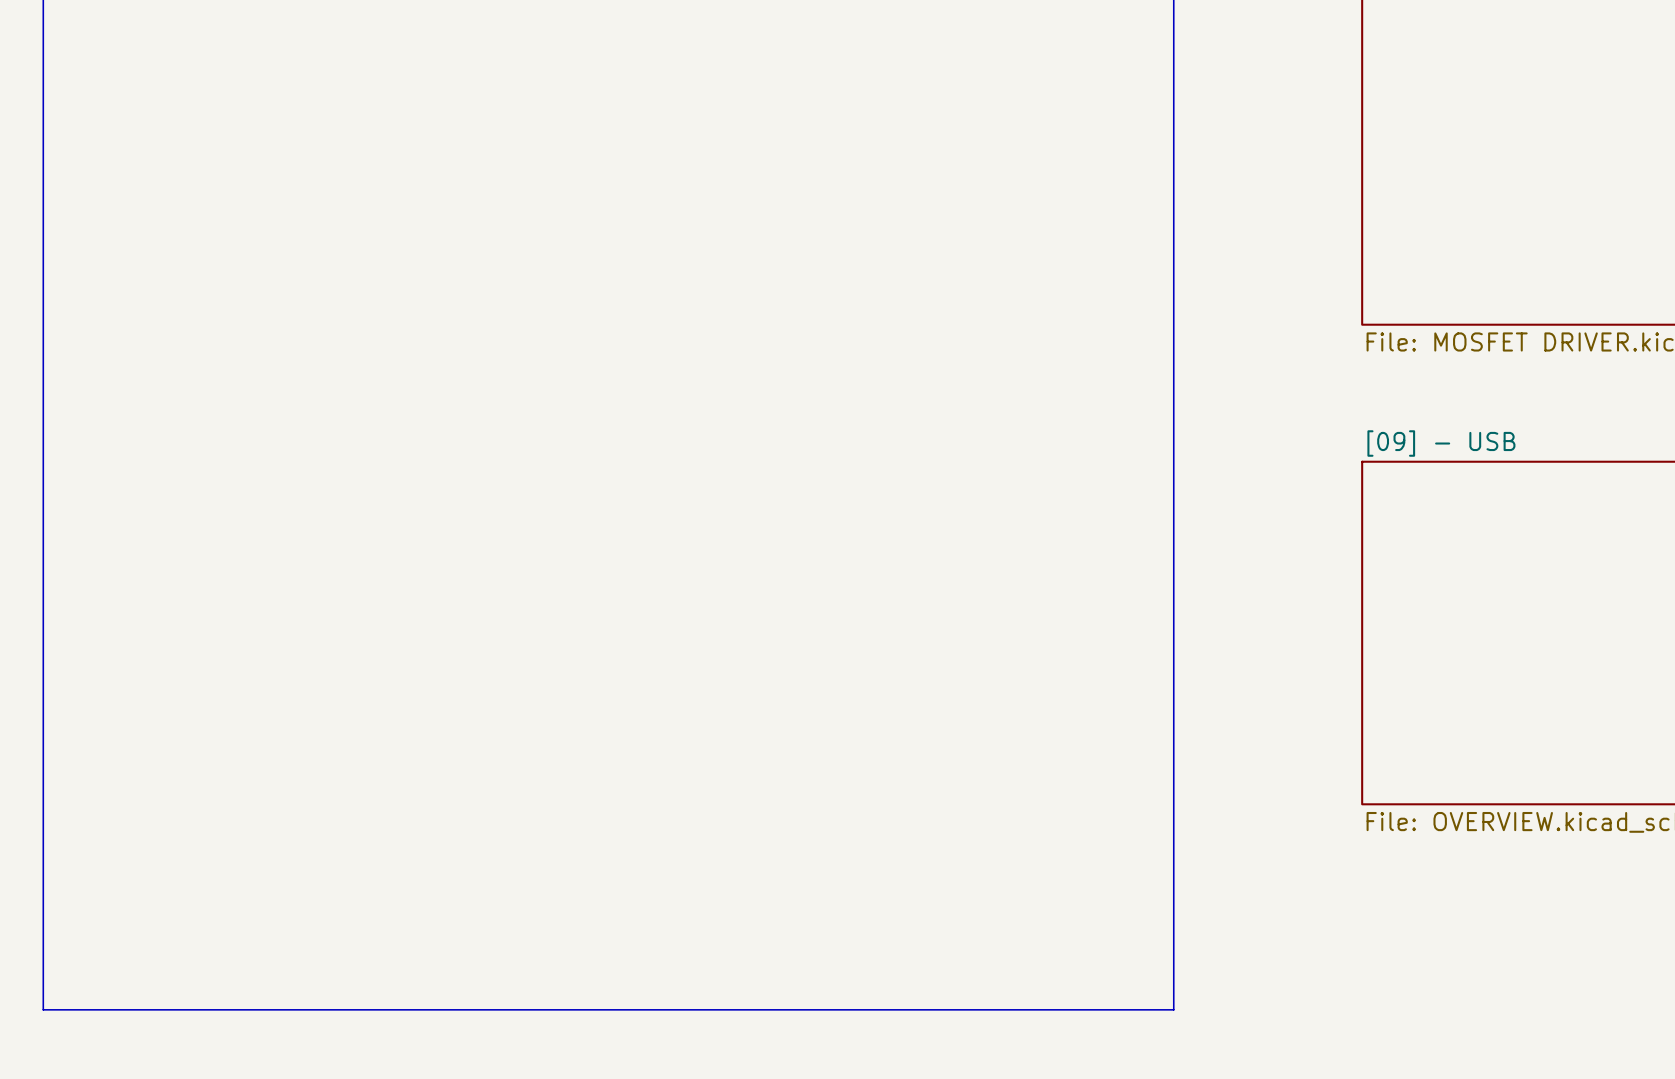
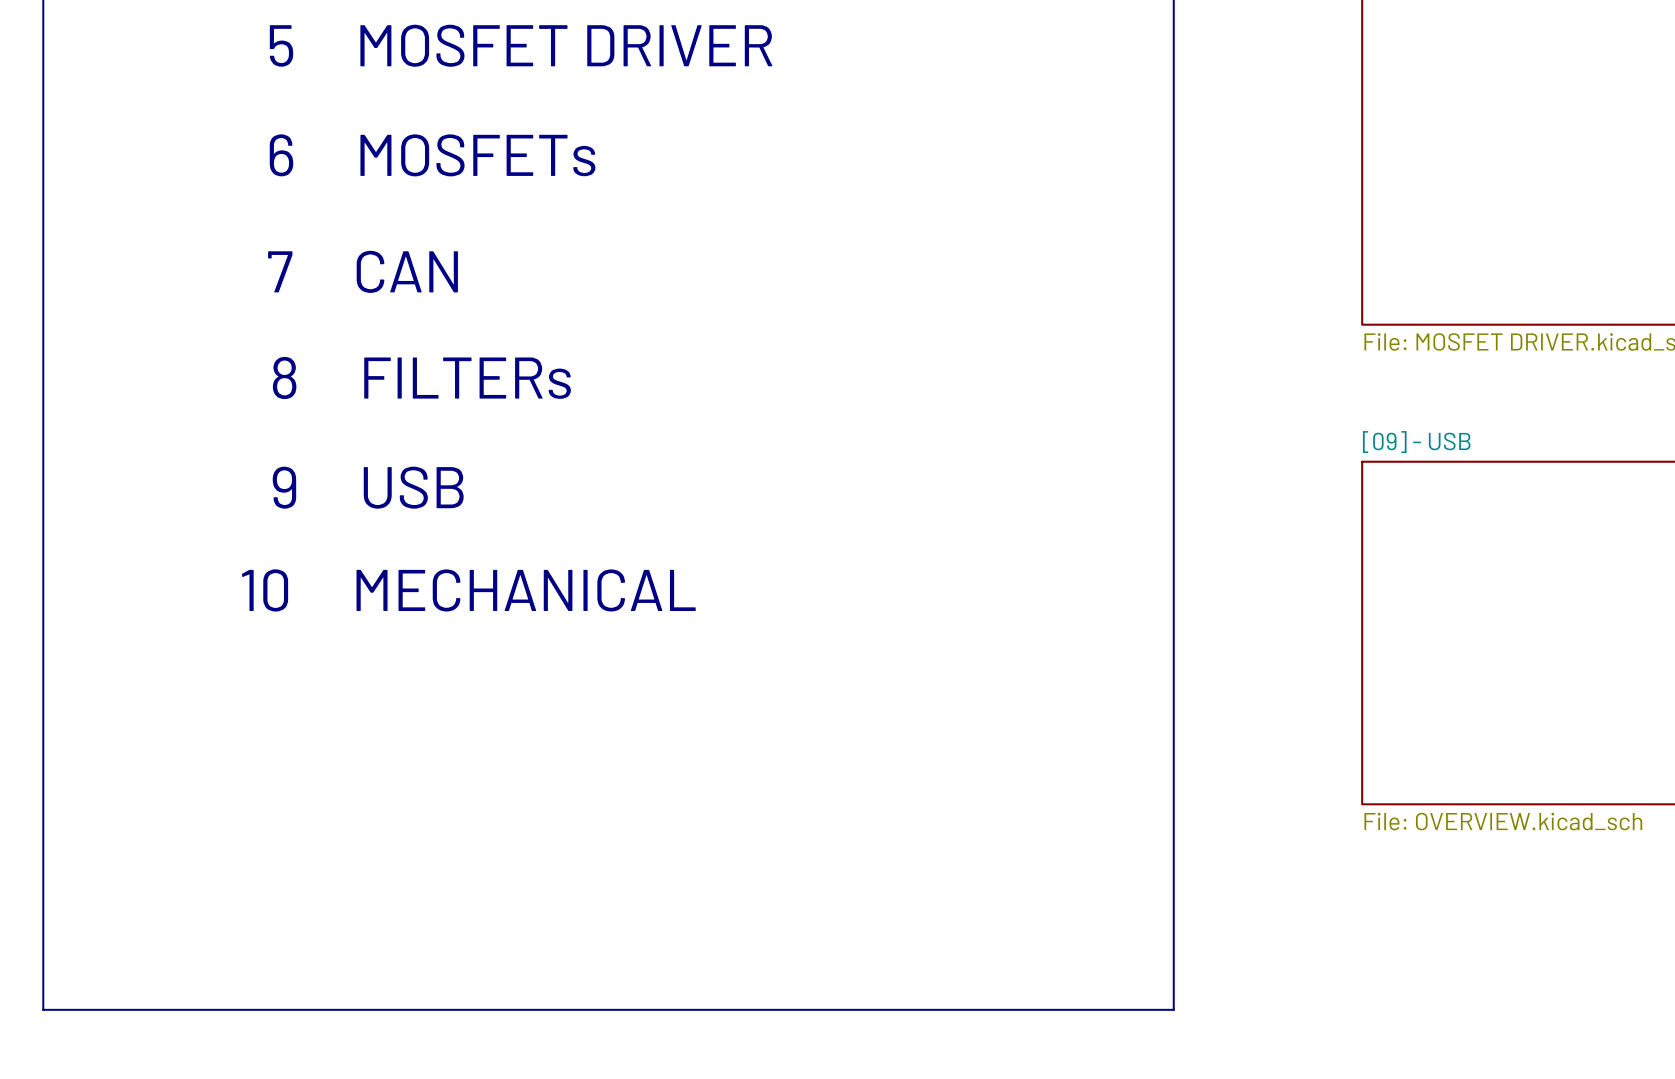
text: none -> 5 MOSFET DRIVER (521, 45)
text: none -> 6 MOSFETs (432, 155)
text: none -> 7 CAN (363, 271)
text: none -> 8 FILTERs (421, 377)
text: none -> 9 USB (368, 487)
text: none -> 10 MECHANICAL (468, 590)

